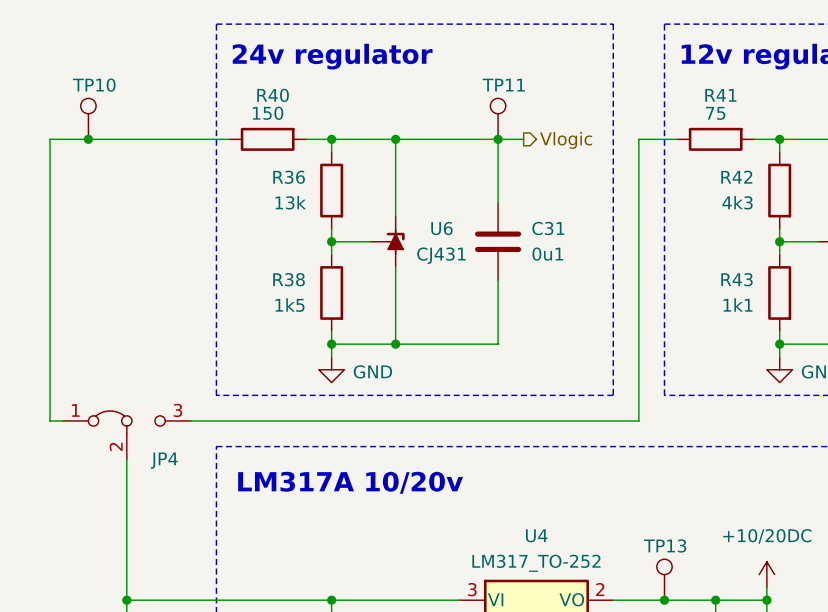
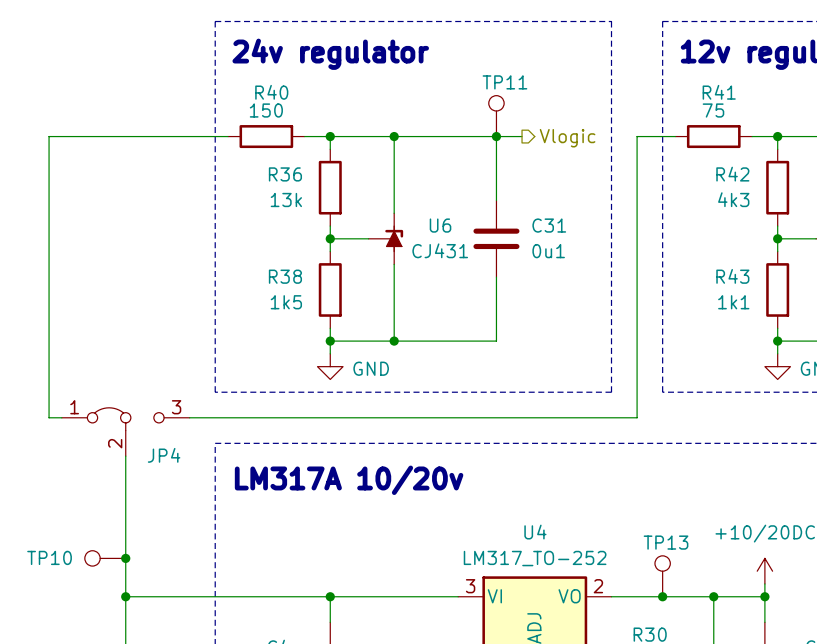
TP10 name position: TP10 (94, 85) -> TP10 (49, 557)
TP10 rotation: 0° (88, 106) -> 90° counterclockwise (92, 558)
TP10 position: (88, 118) -> (105, 558)
junction: (88, 139) -> none
junction: none -> (125, 558)

